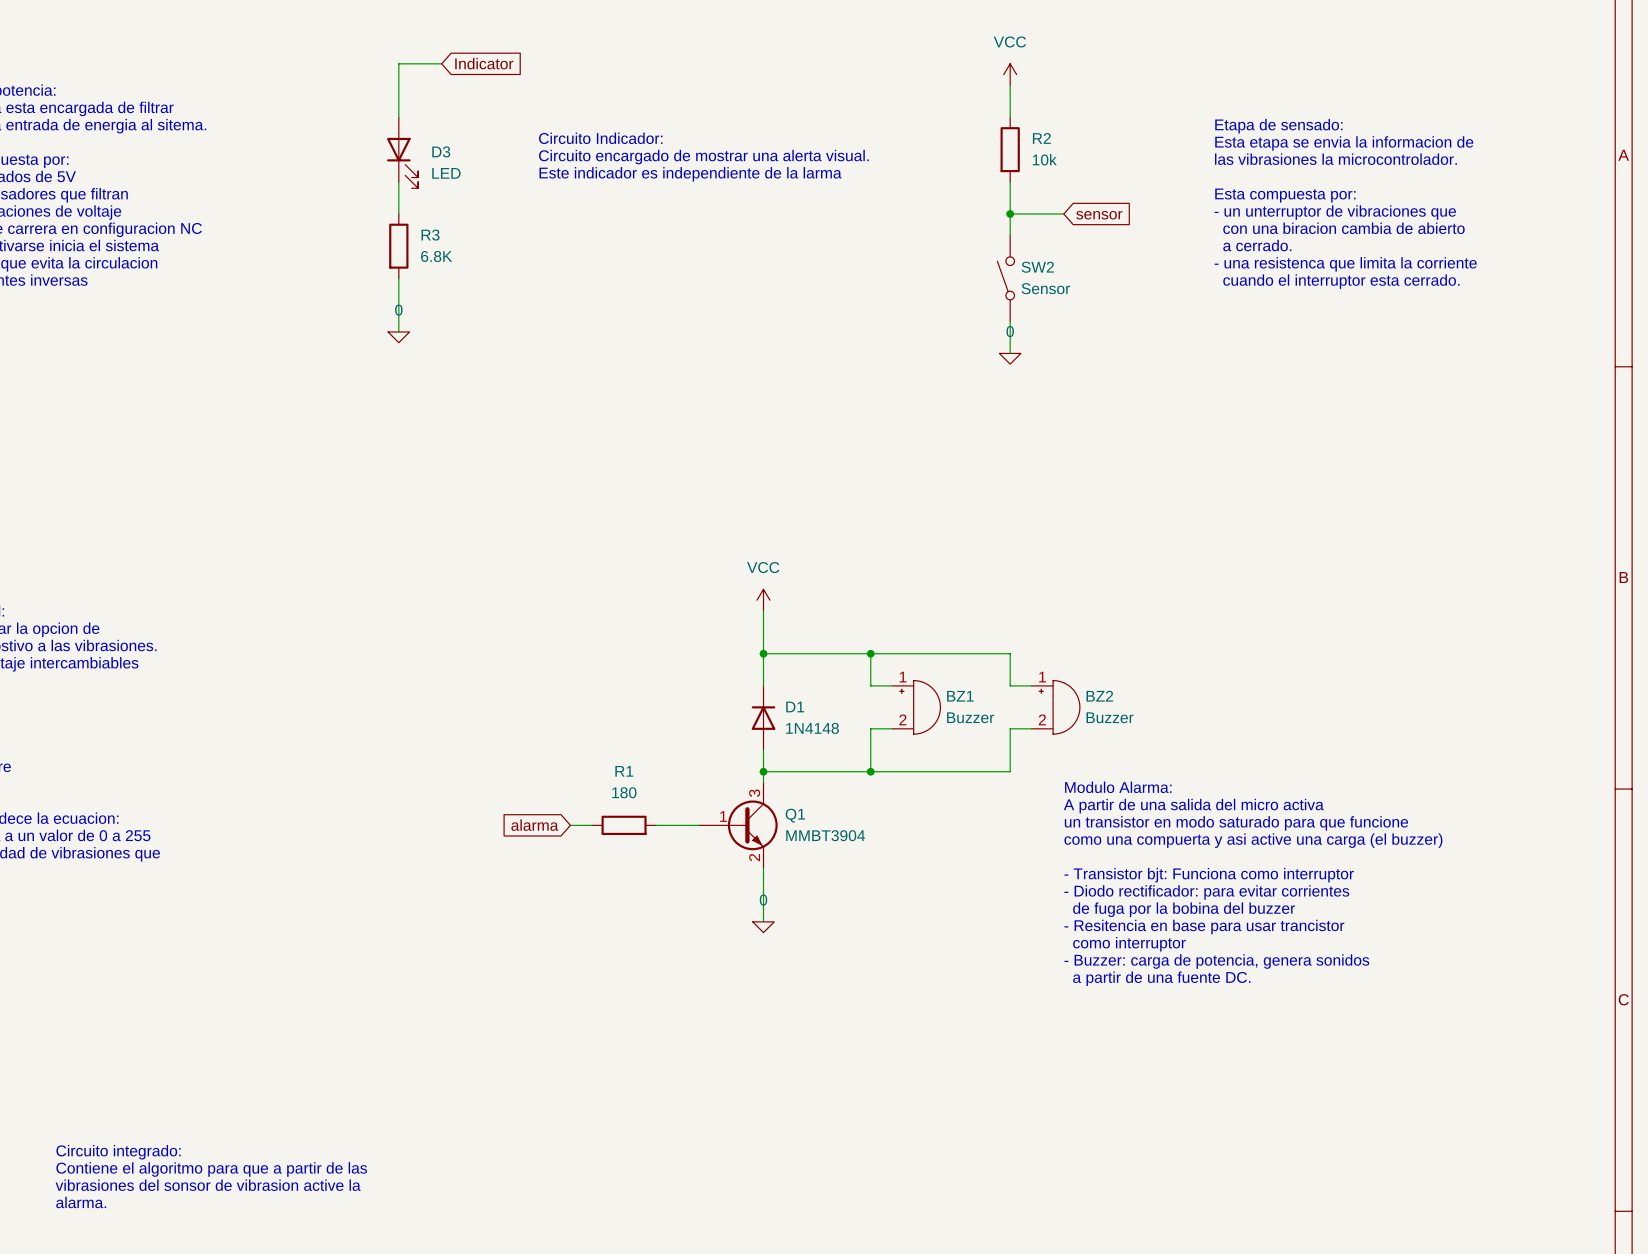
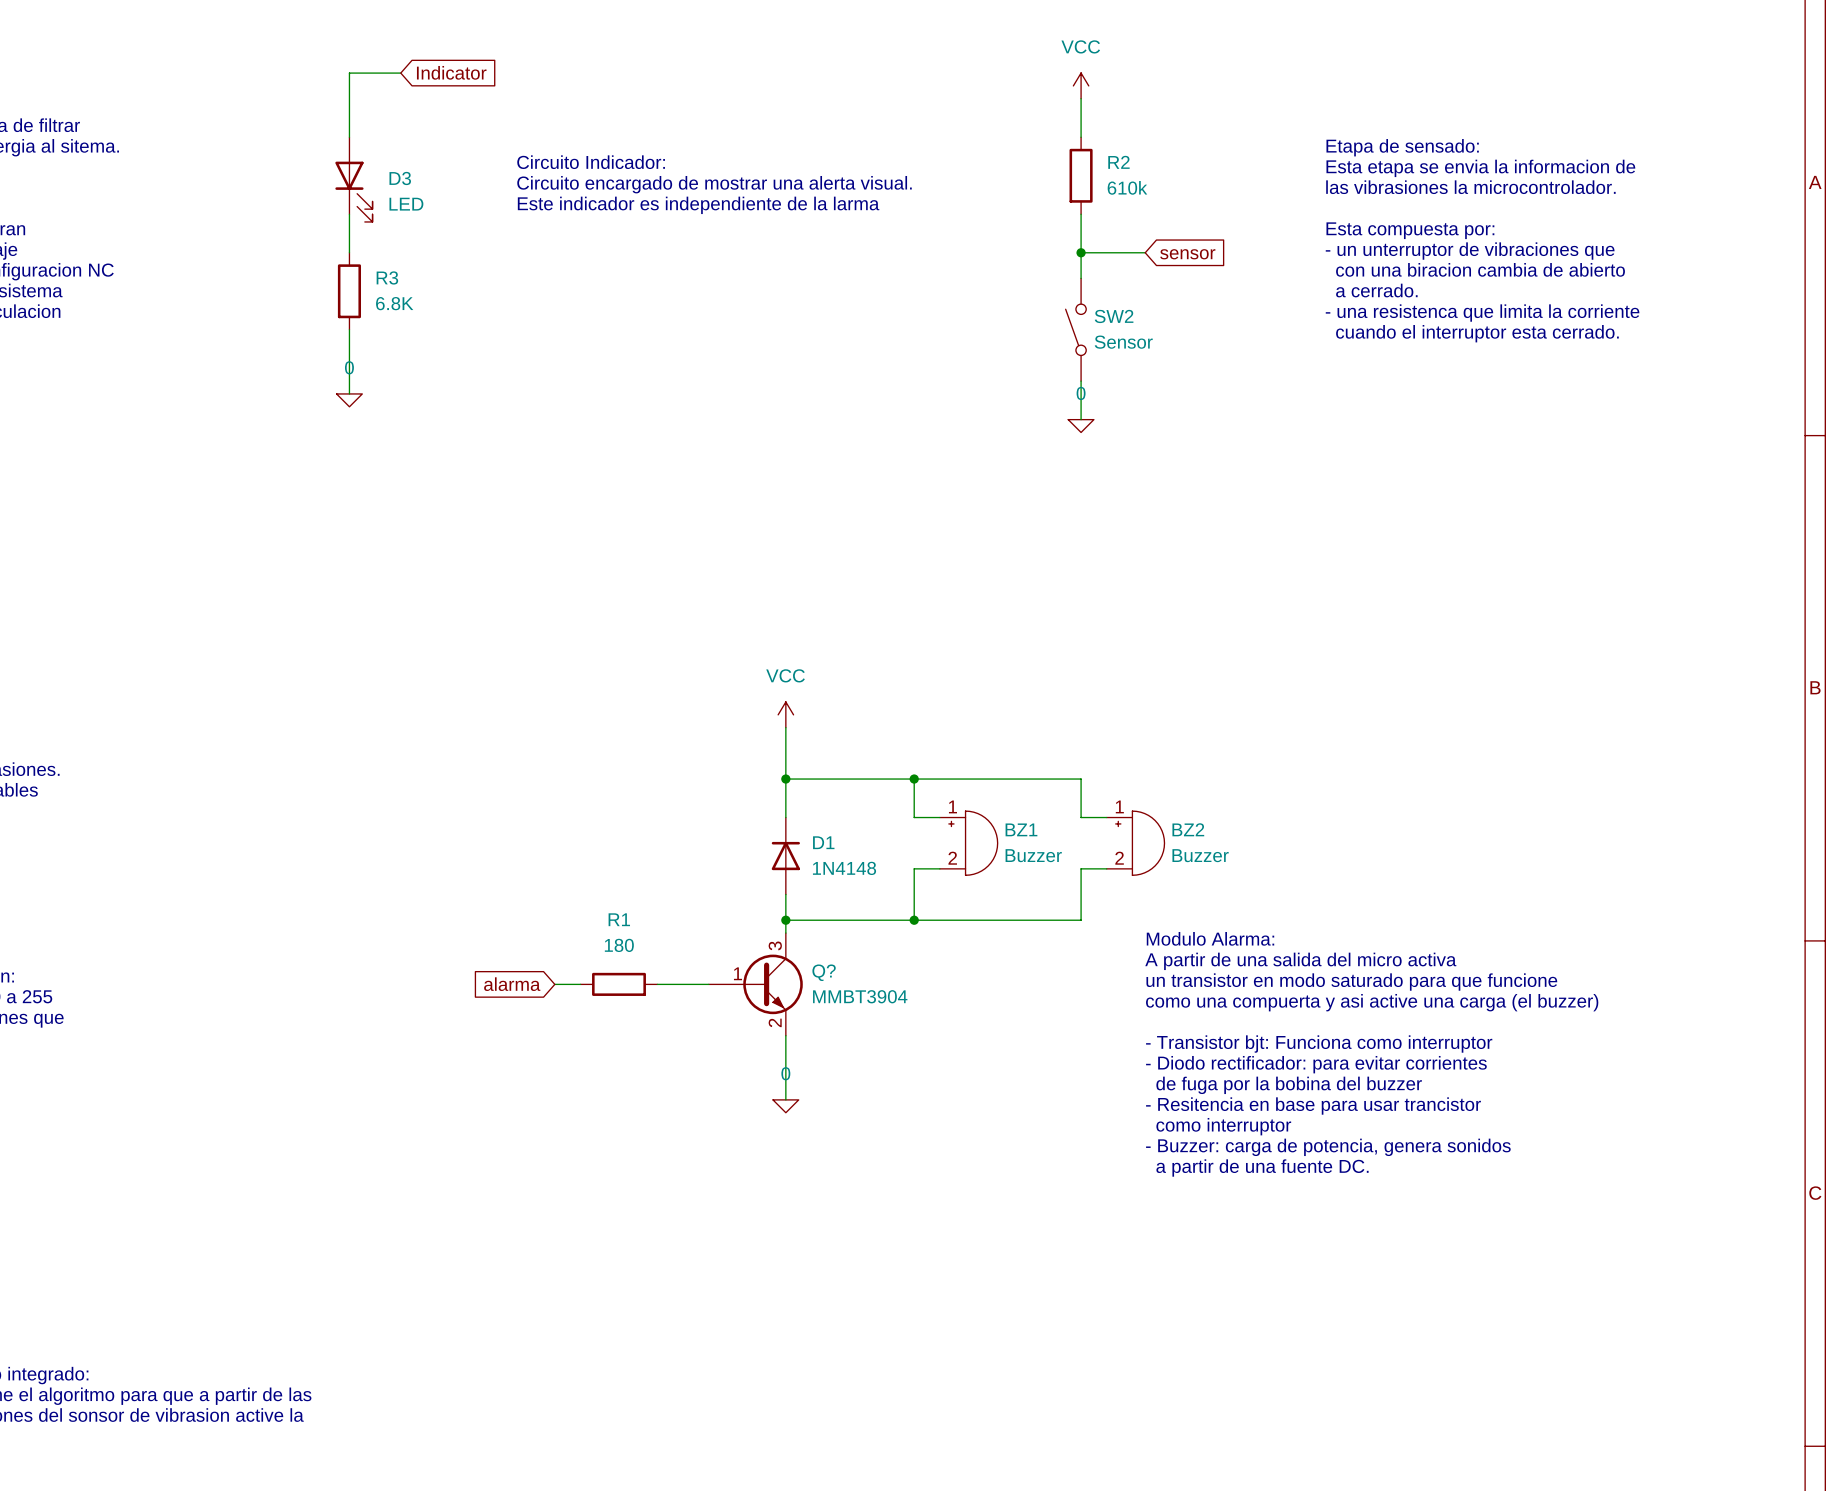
R2 value: 10k (1044, 159) -> 610k (1127, 187)
Q1 name: Q1 (795, 815) -> Q? (824, 972)

